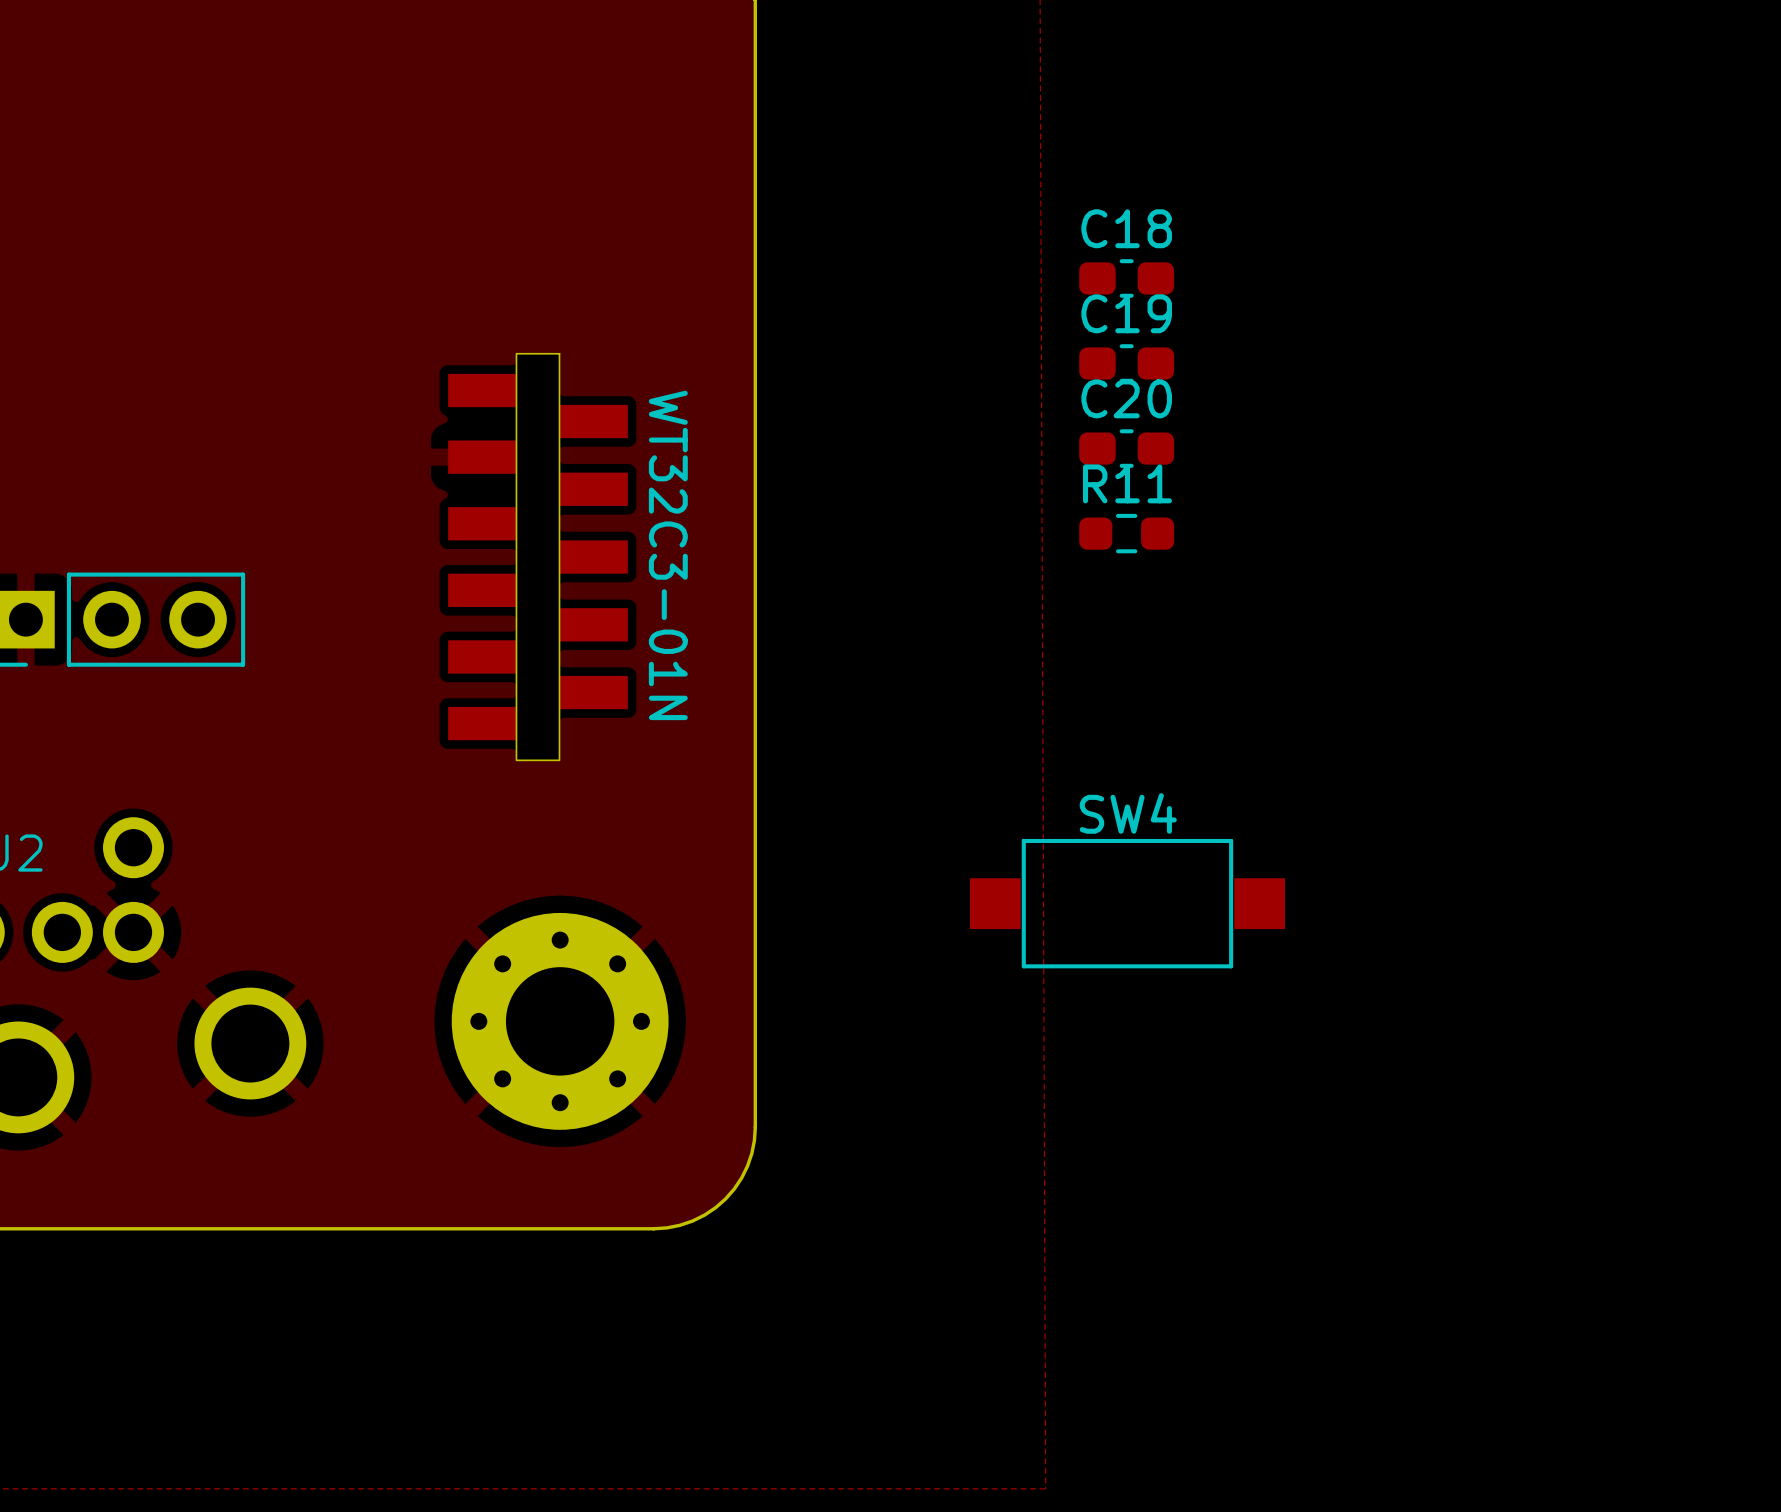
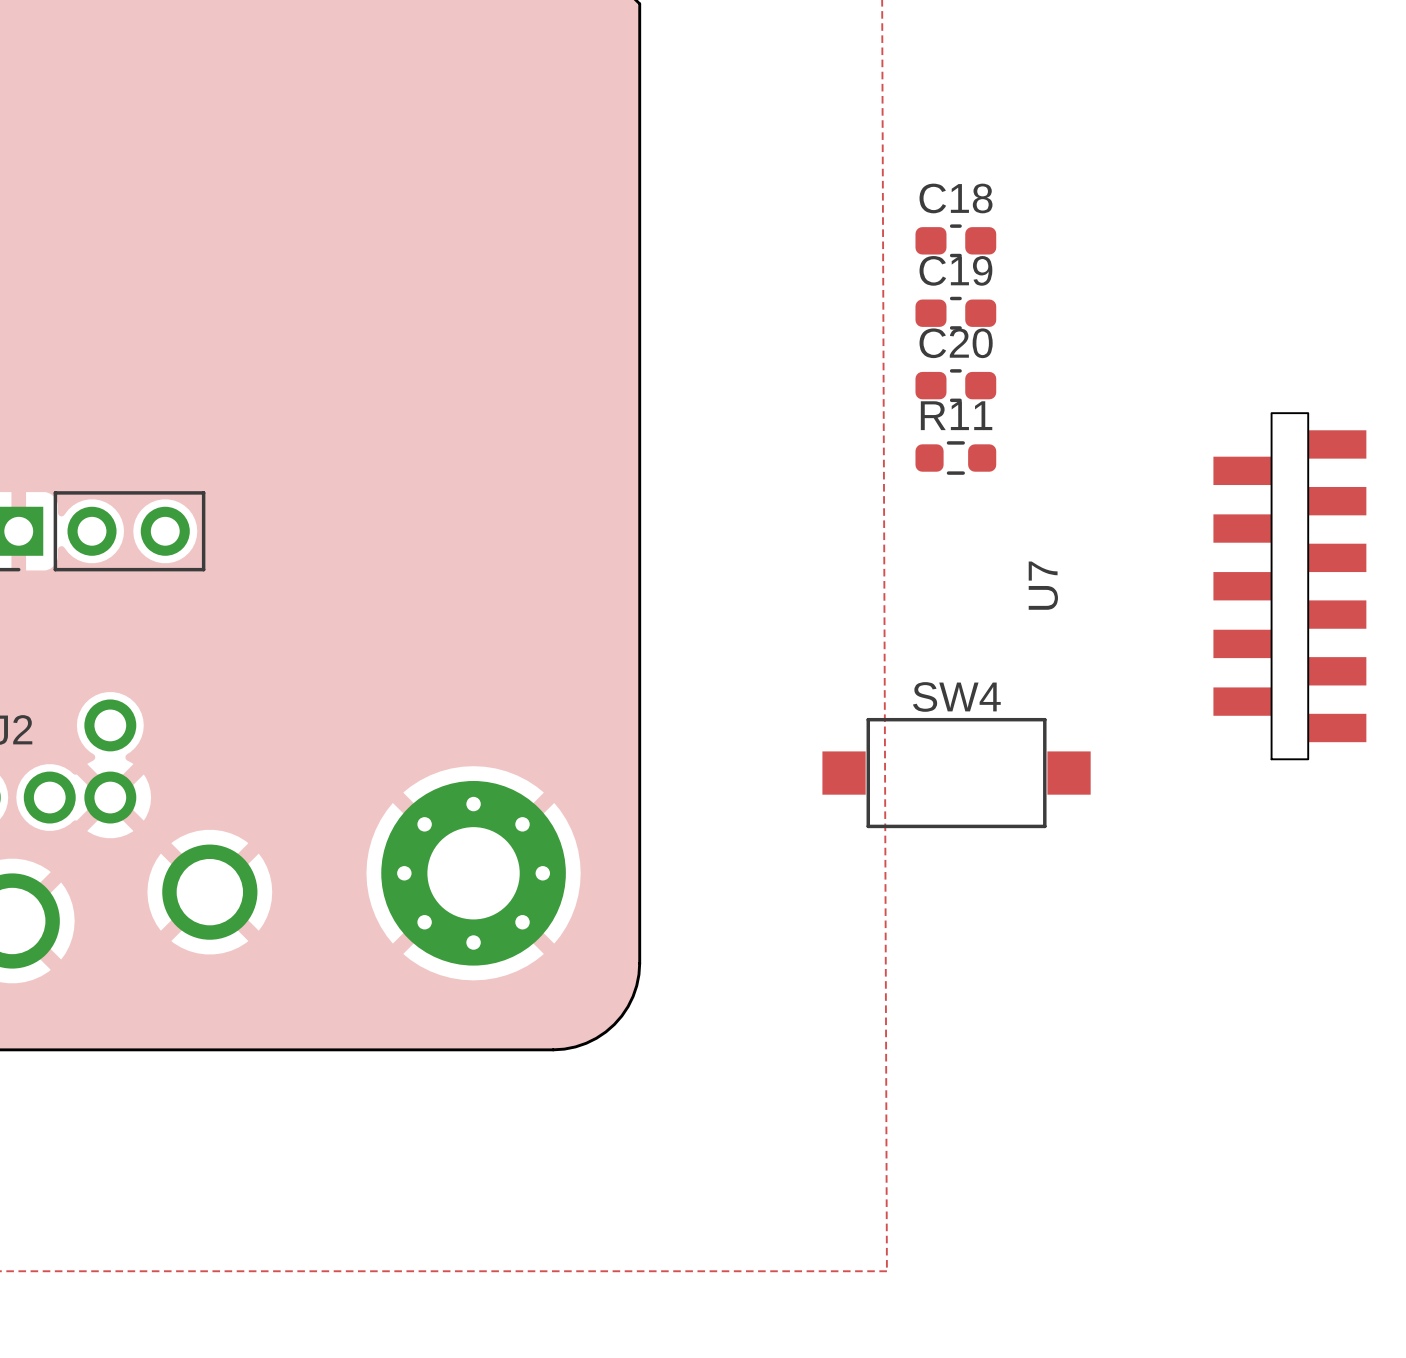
part: WT32C3-01N (537, 557) -> none
U7: none -> (1289, 586)

